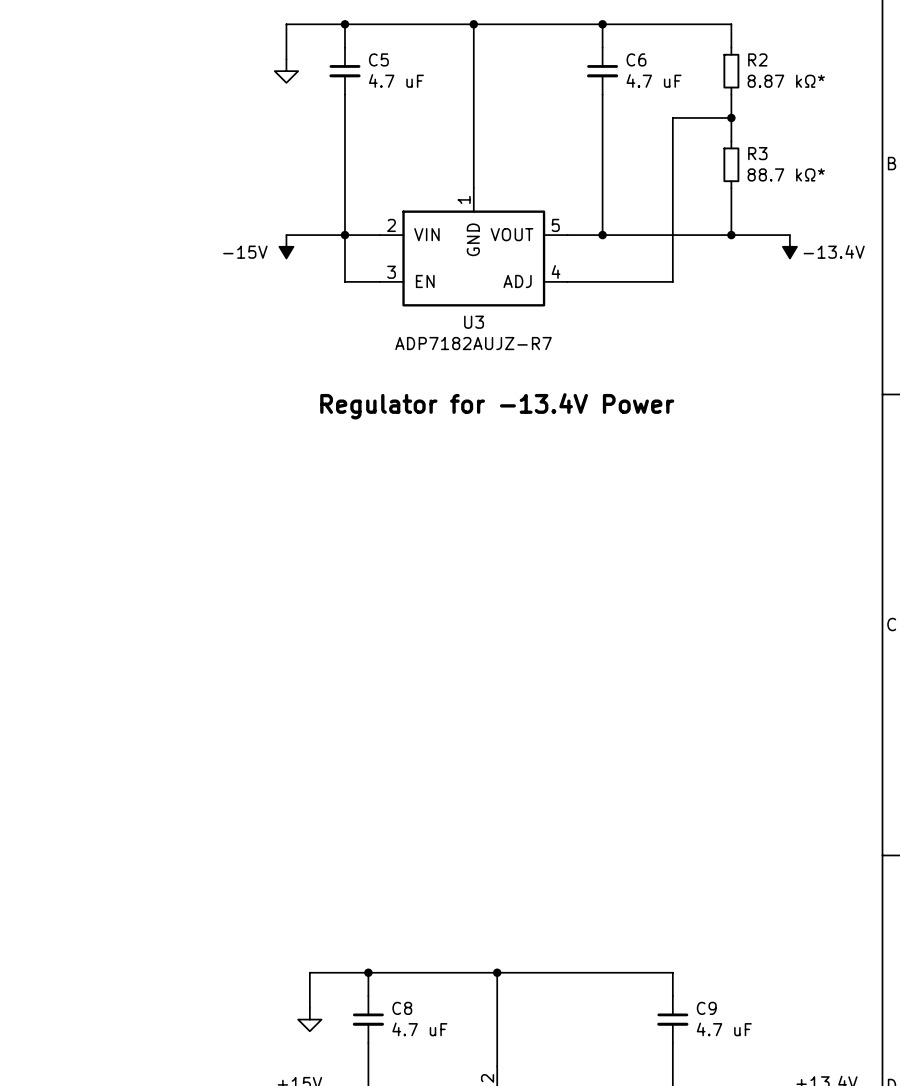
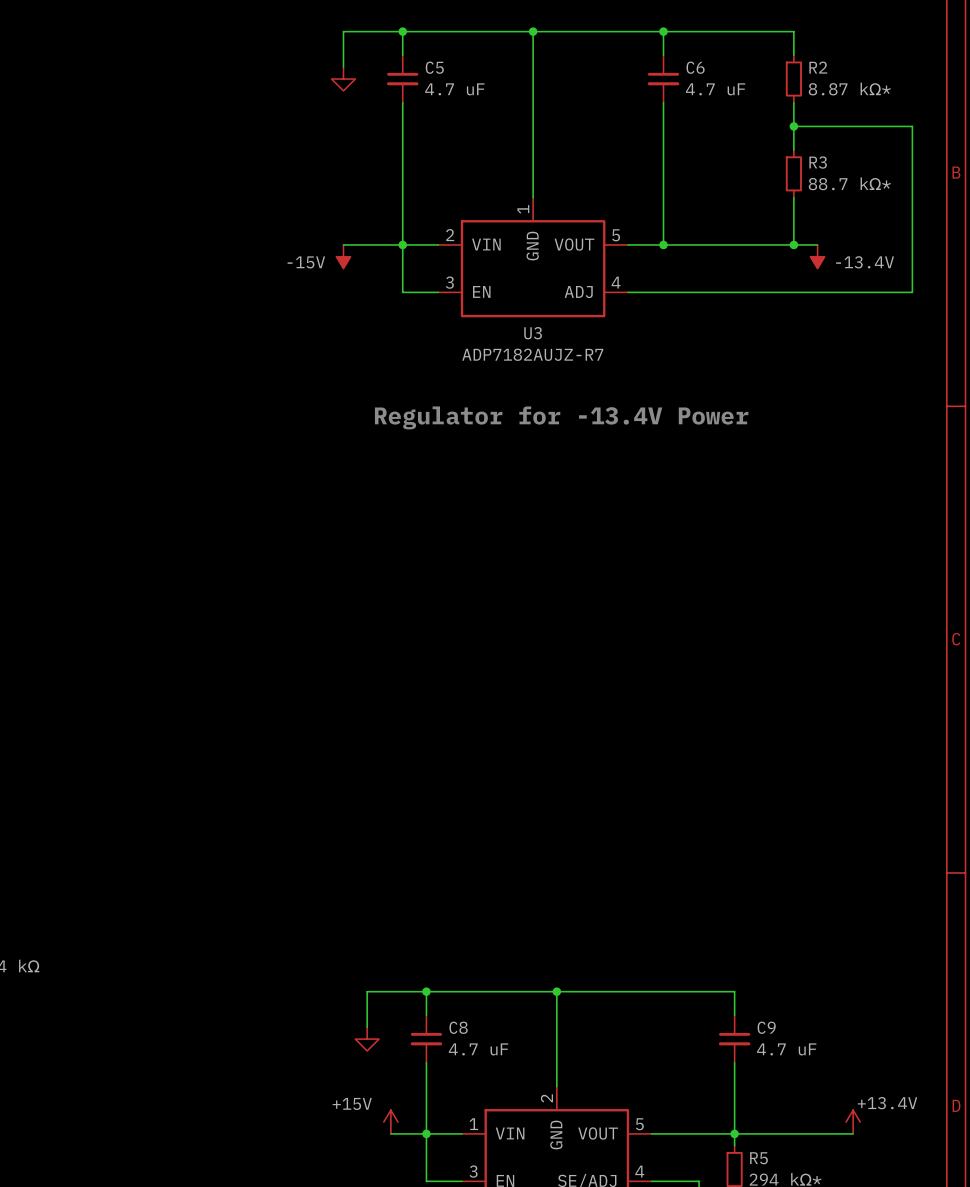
wire: (731, 117) (672, 117) (672, 281) -> (793, 126) (912, 126) (912, 292) (734, 292)
wire: (754, 235) (789, 235) -> none
power symbol position: -13.4V (789, 246) -> -13.4V (817, 256)

